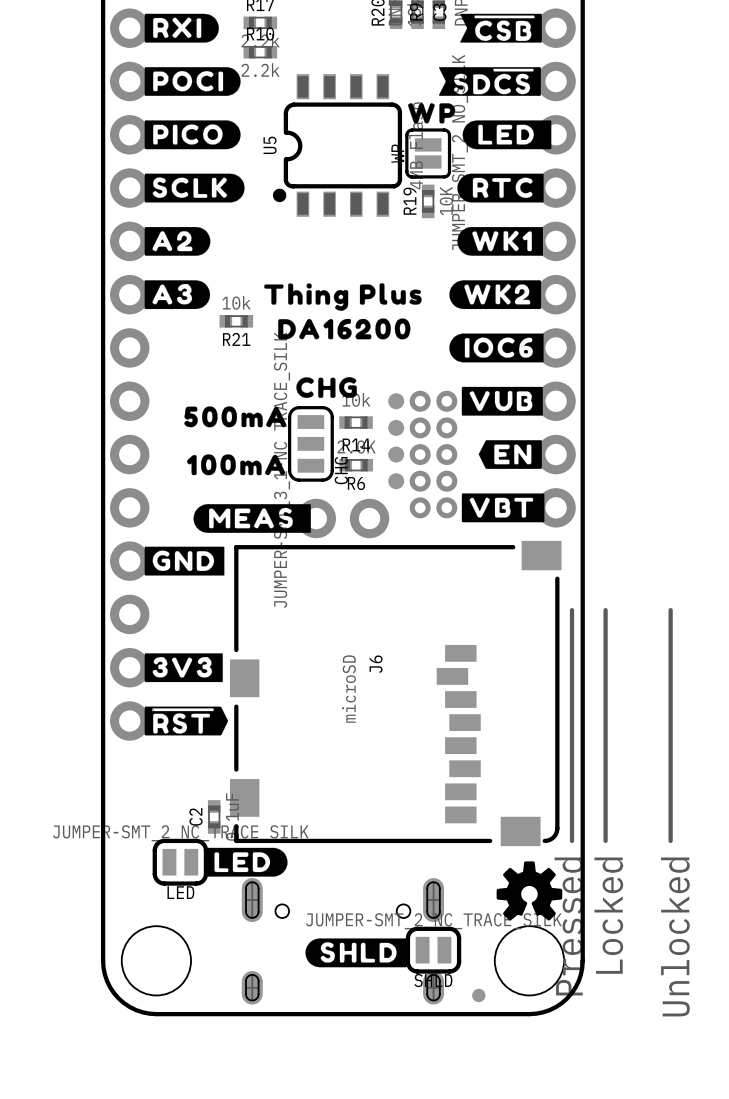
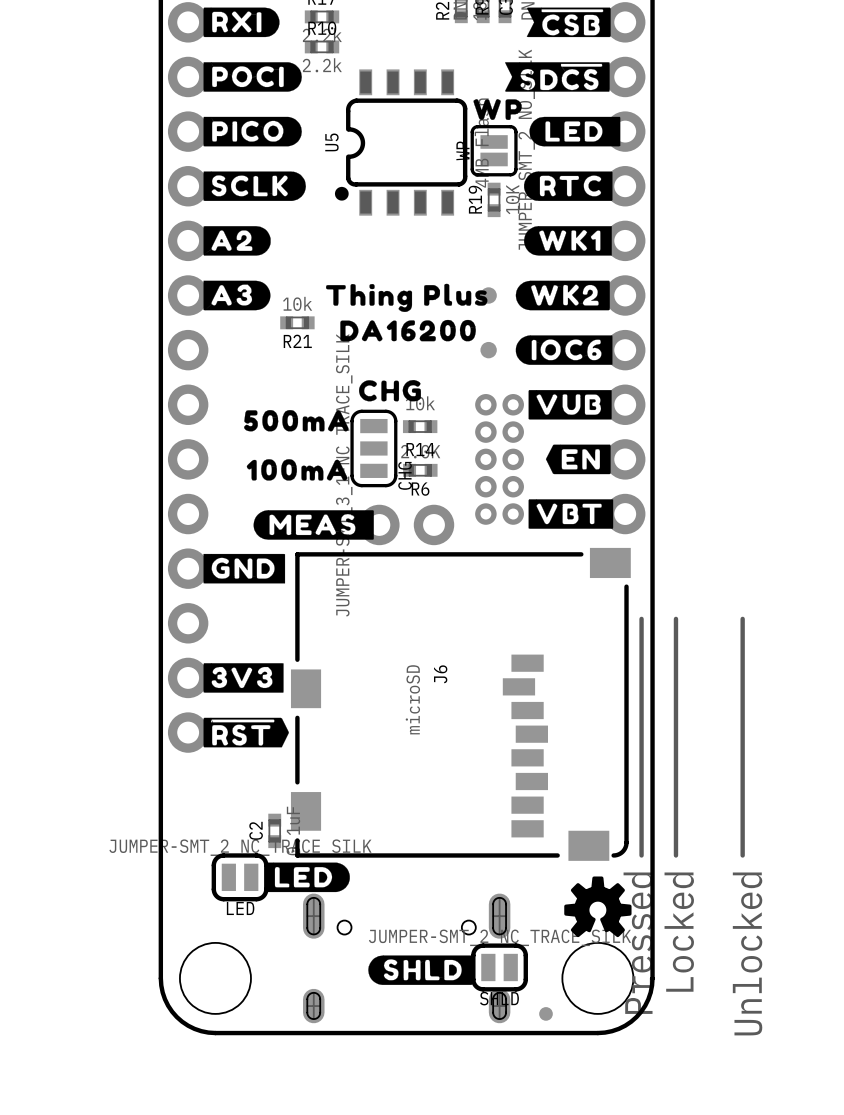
part: none -> (488, 295)
part: none -> (488, 350)
part: (396, 401) -> none
part: (396, 427) -> none
part: (396, 454) -> none
part: (396, 481) -> none

